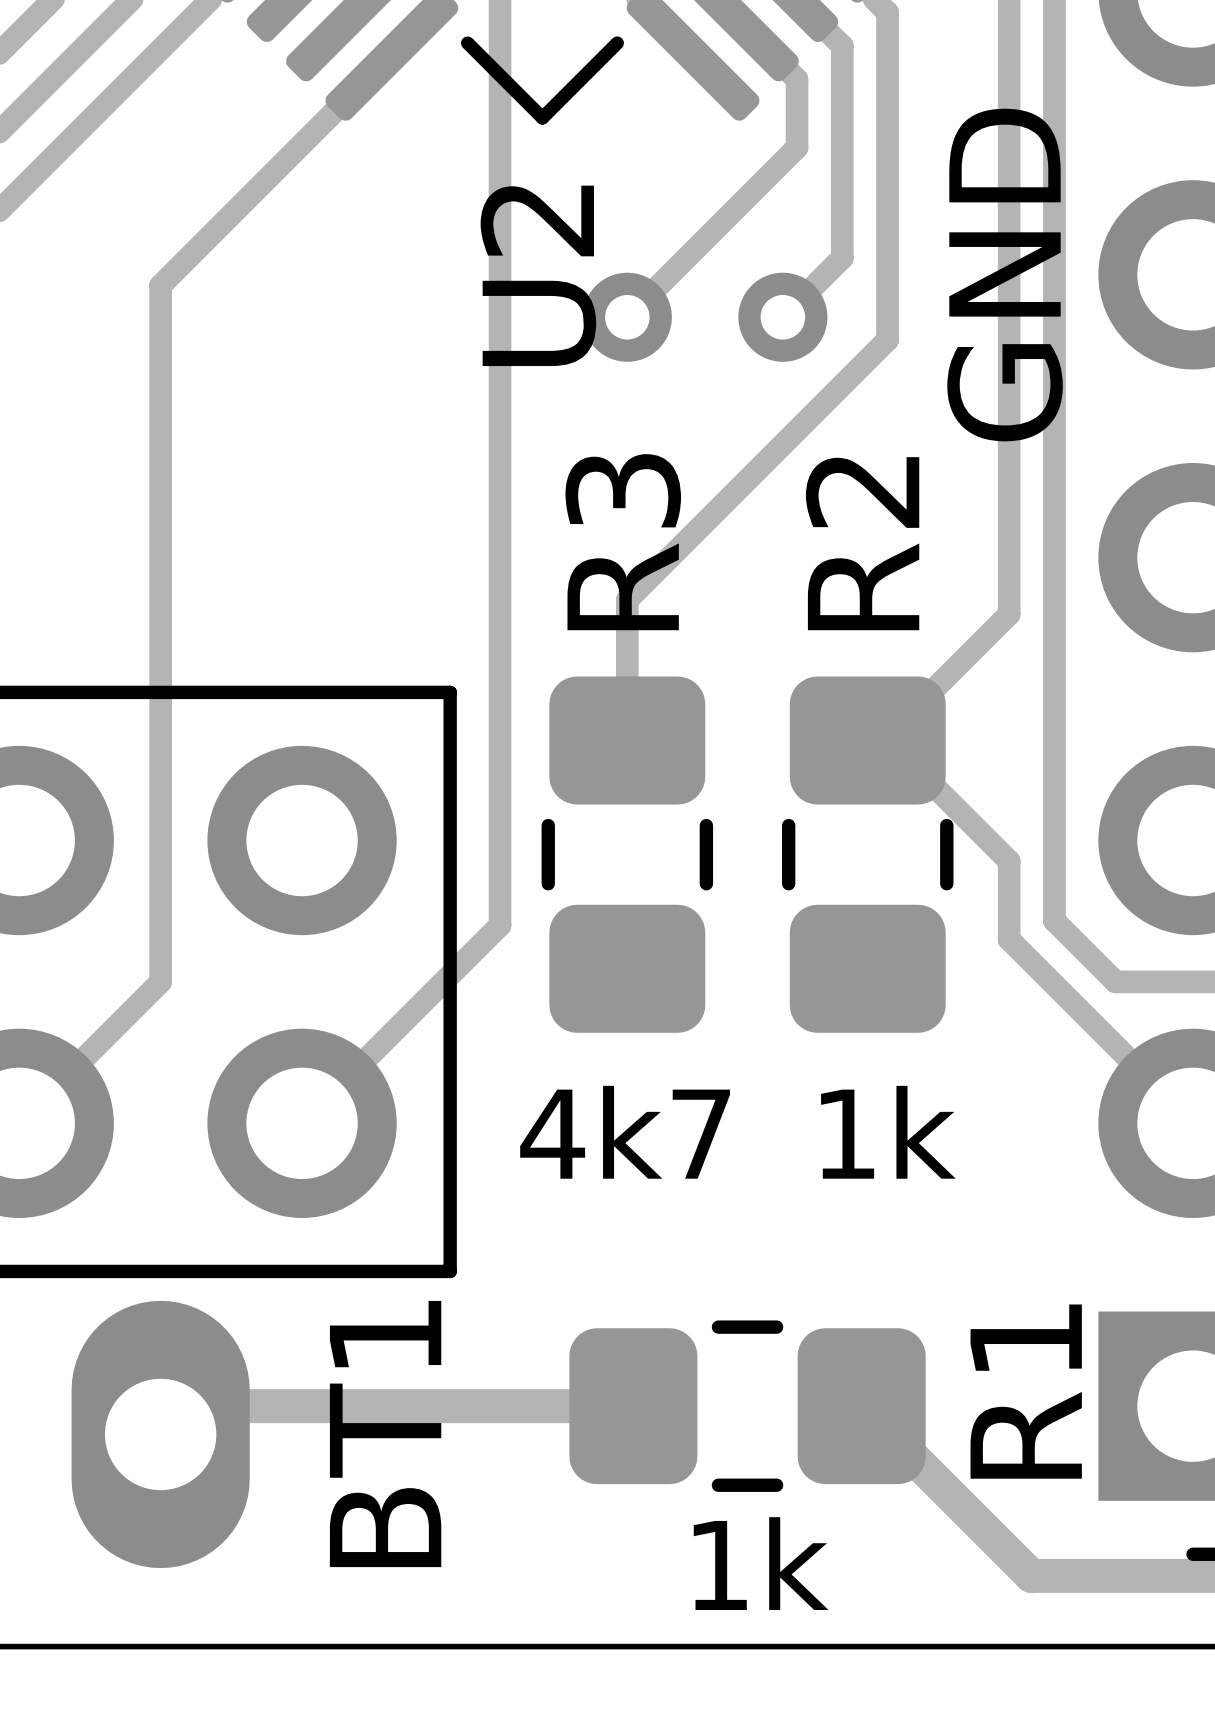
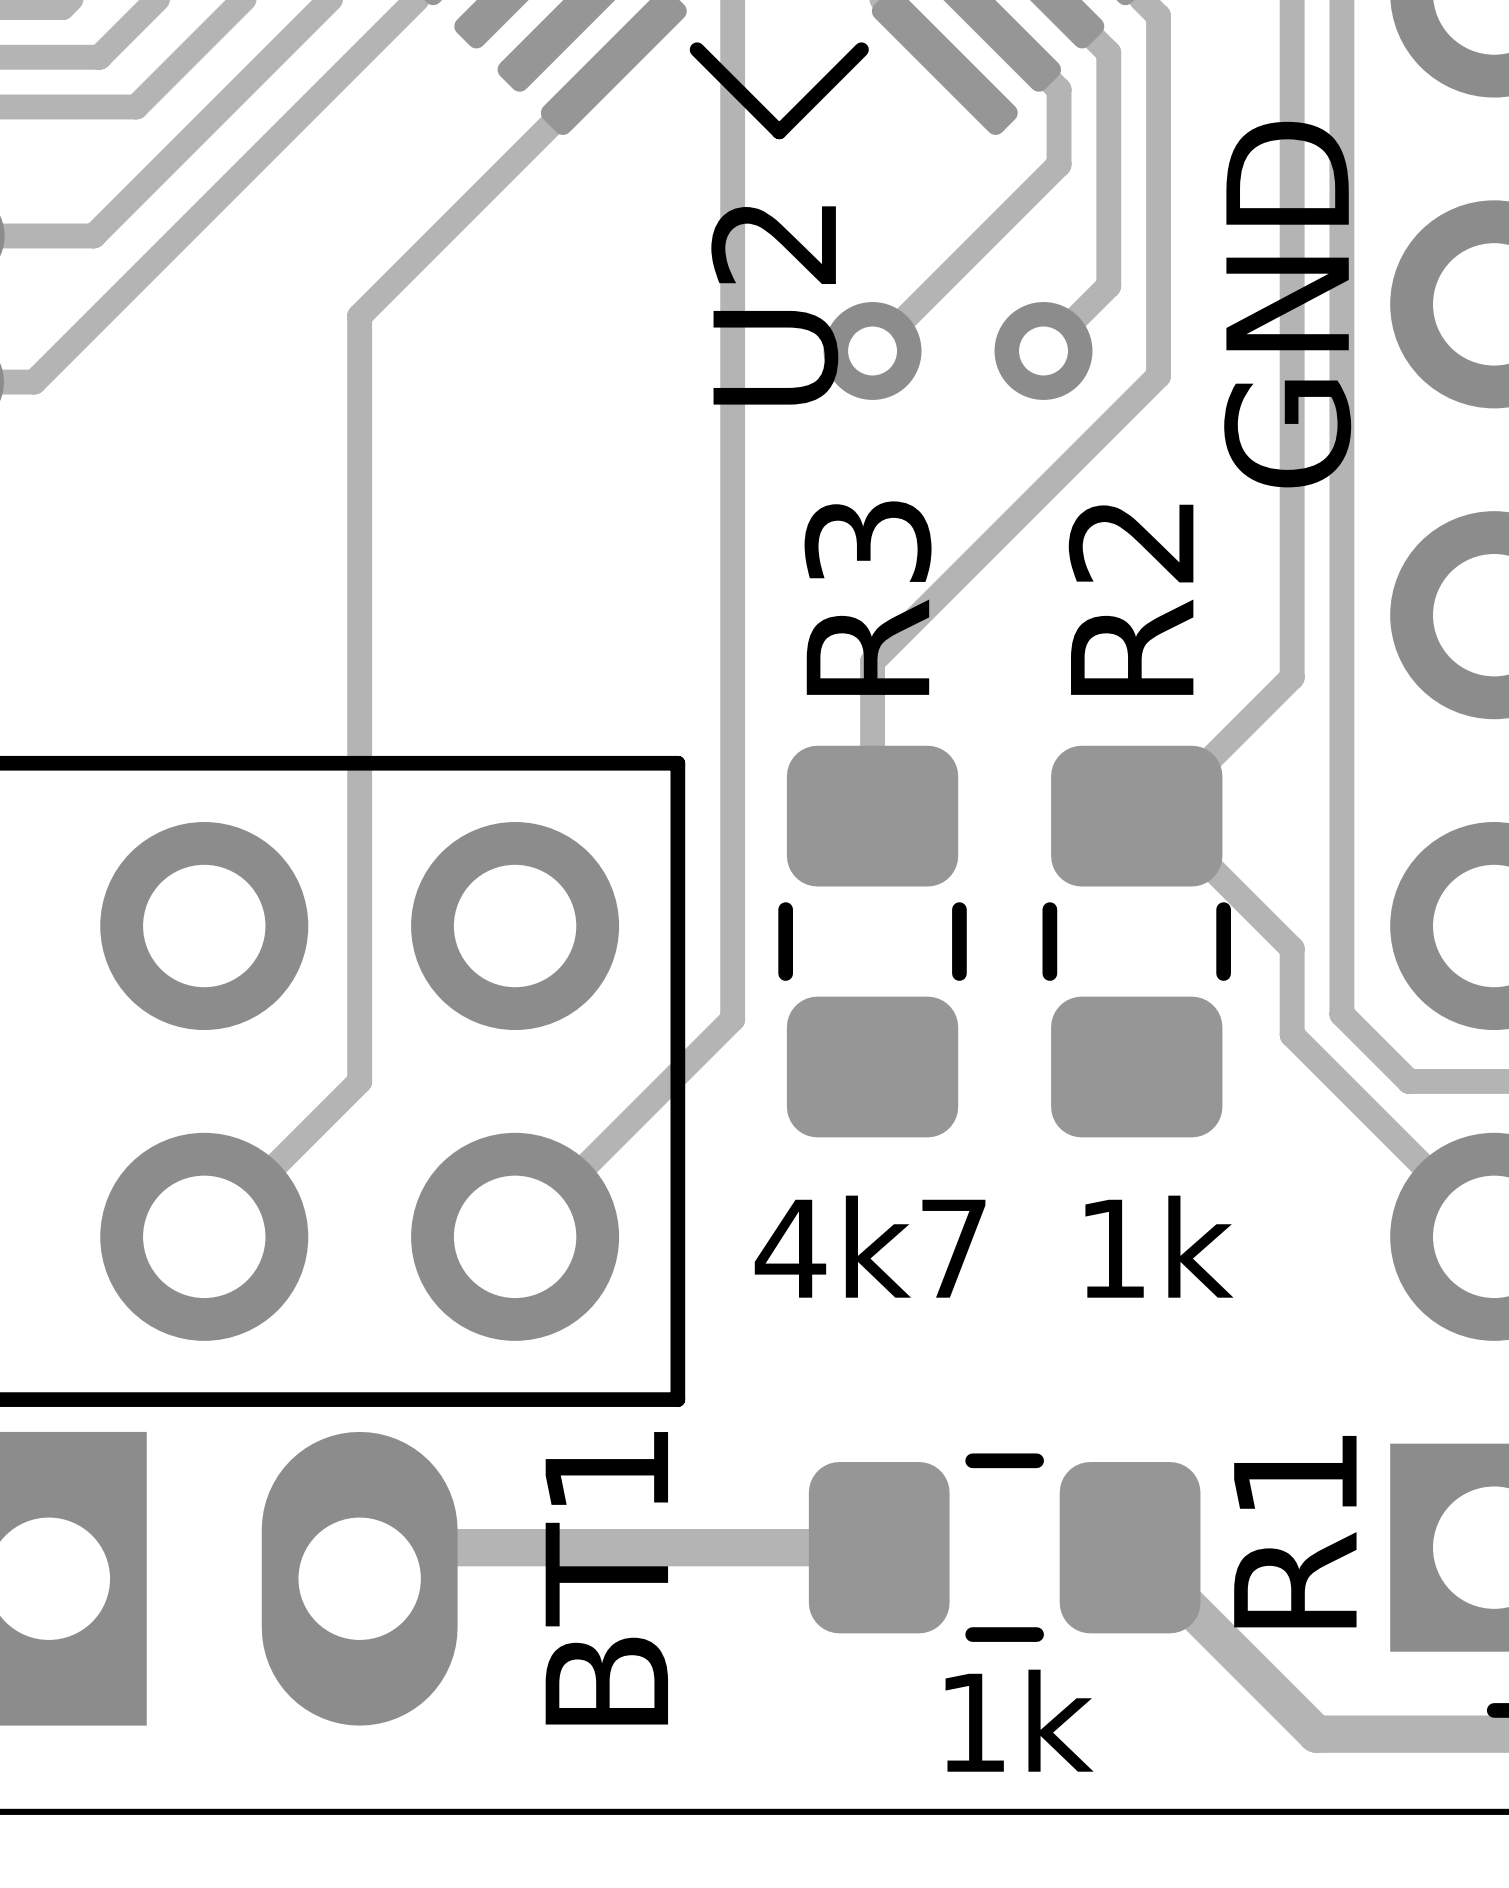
R1 name position: R1 (1026, 1391) -> R1 (1295, 1531)

